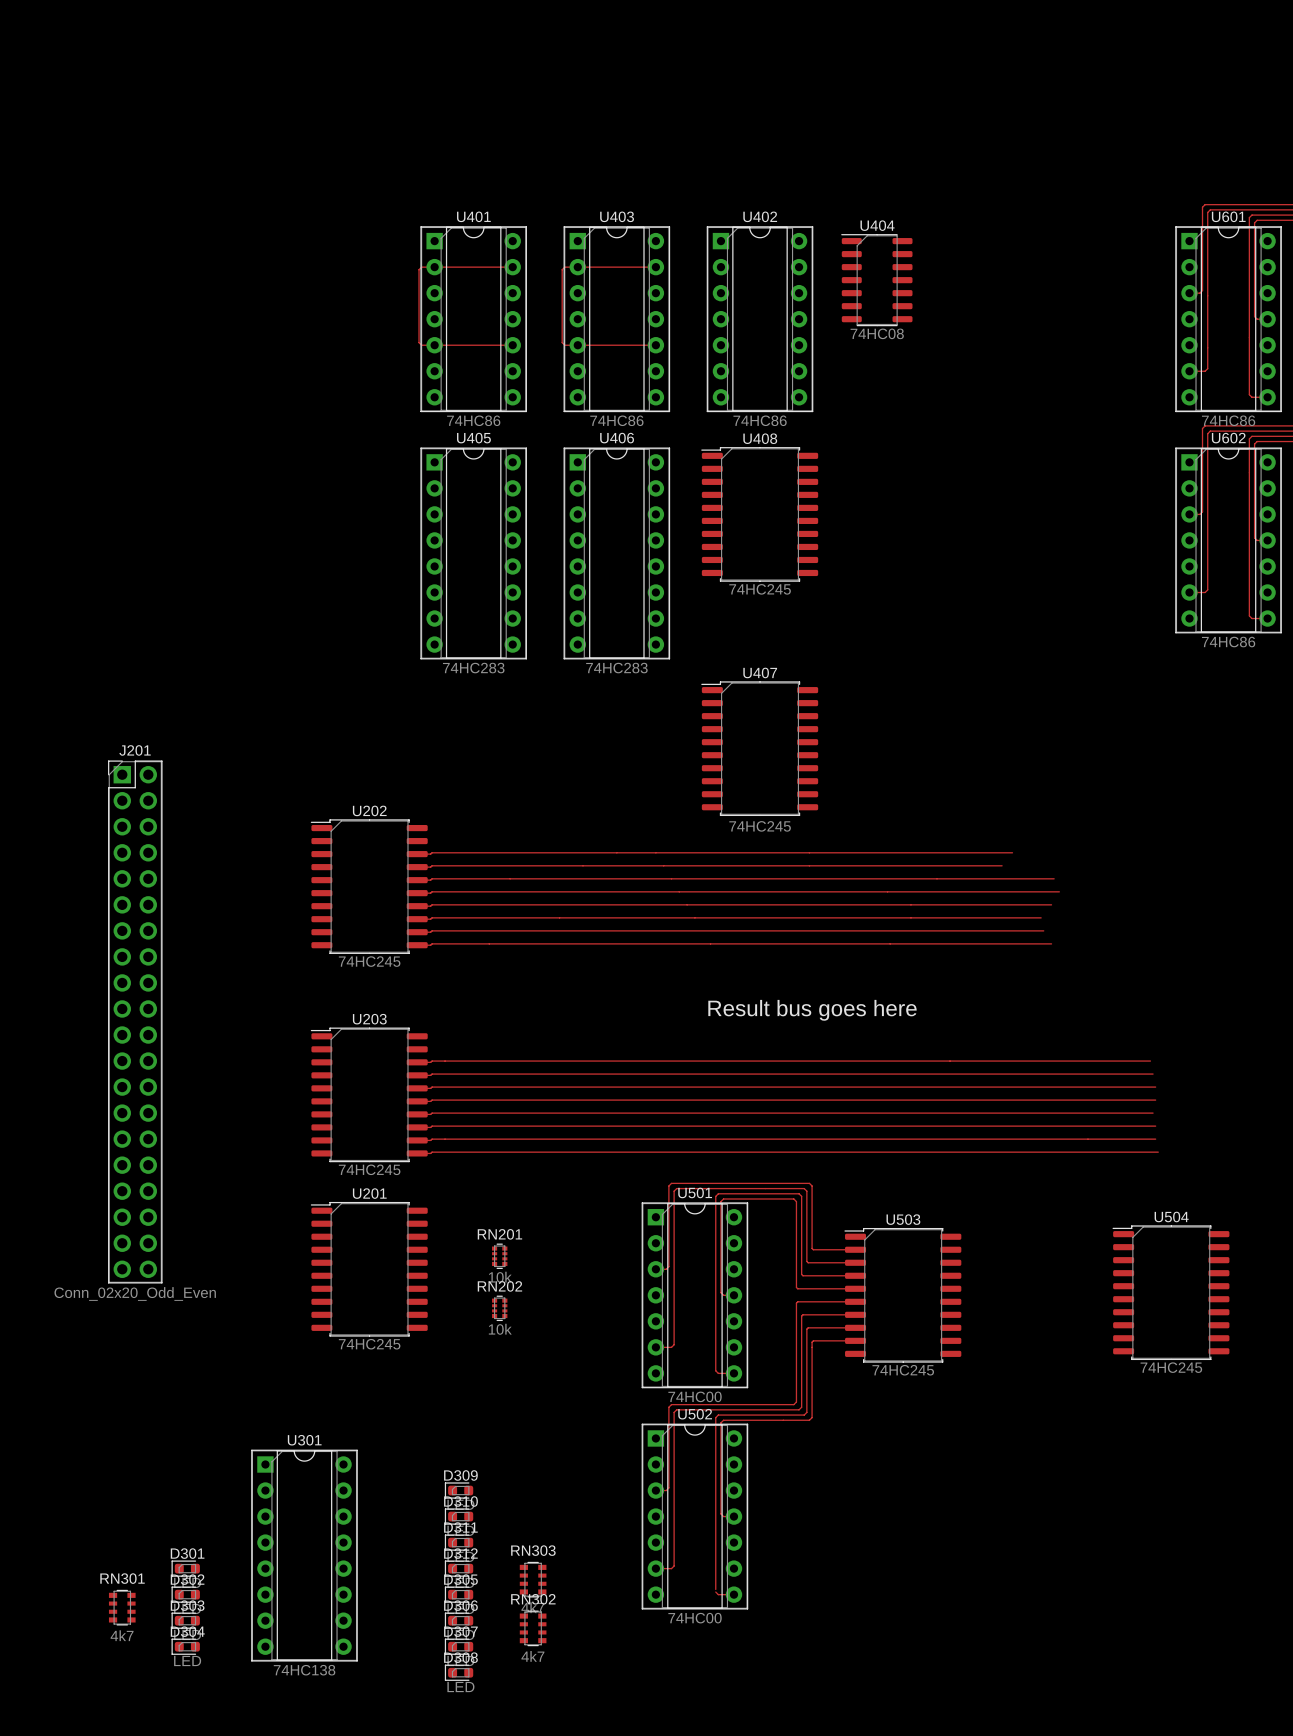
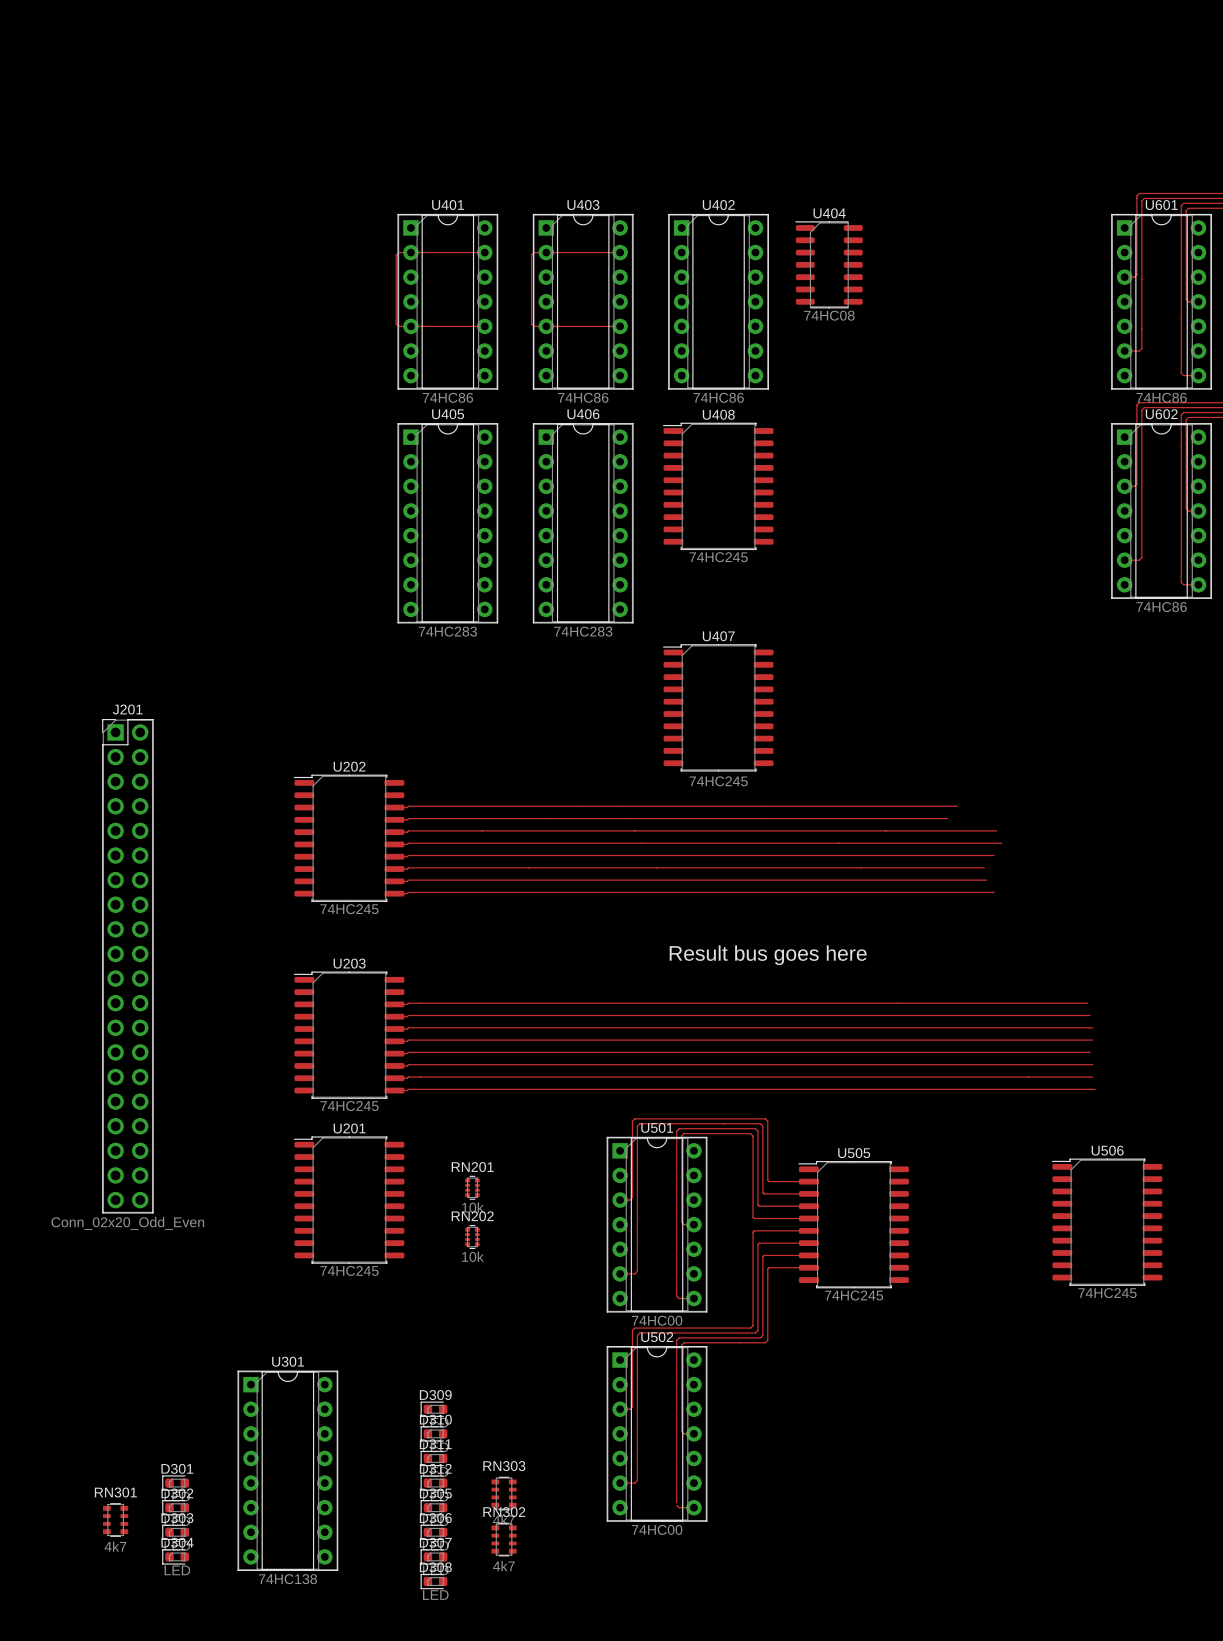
U504 name: U504 (1171, 1217) -> U506 (1107, 1150)
U503 name: U503 (903, 1219) -> U505 (854, 1153)

